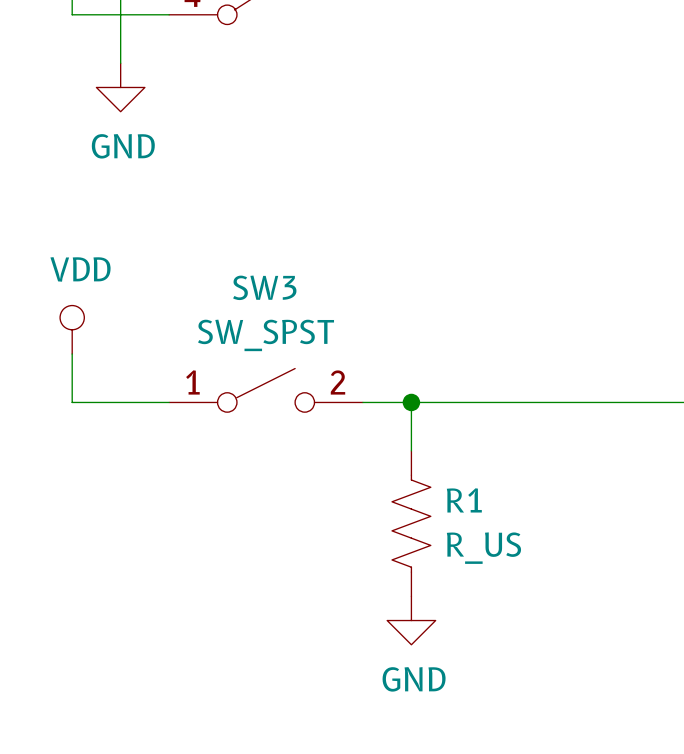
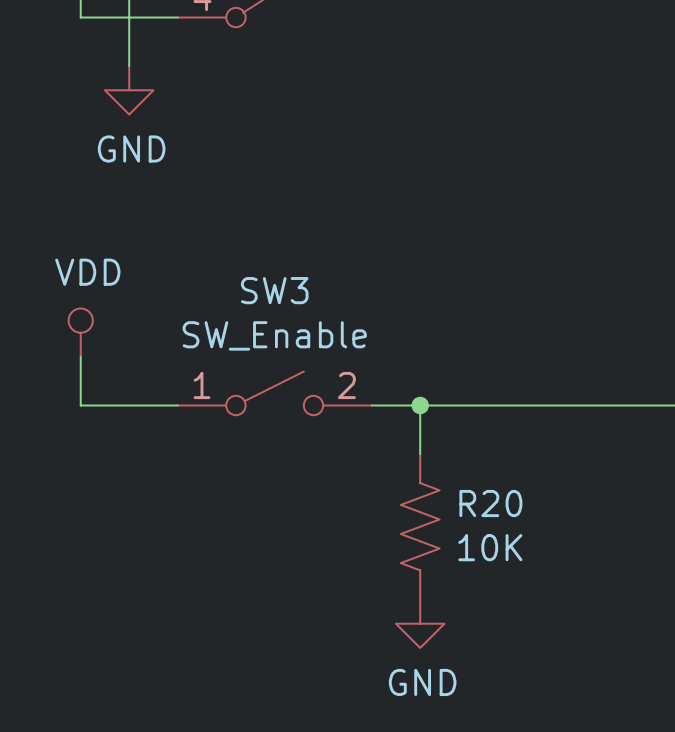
SW3 value: SW_SPST (266, 335) -> SW_Enable (274, 335)
R1 name: R1 (464, 500) -> R20 (490, 503)
R1 value: R_US (483, 548) -> 10K (490, 547)

